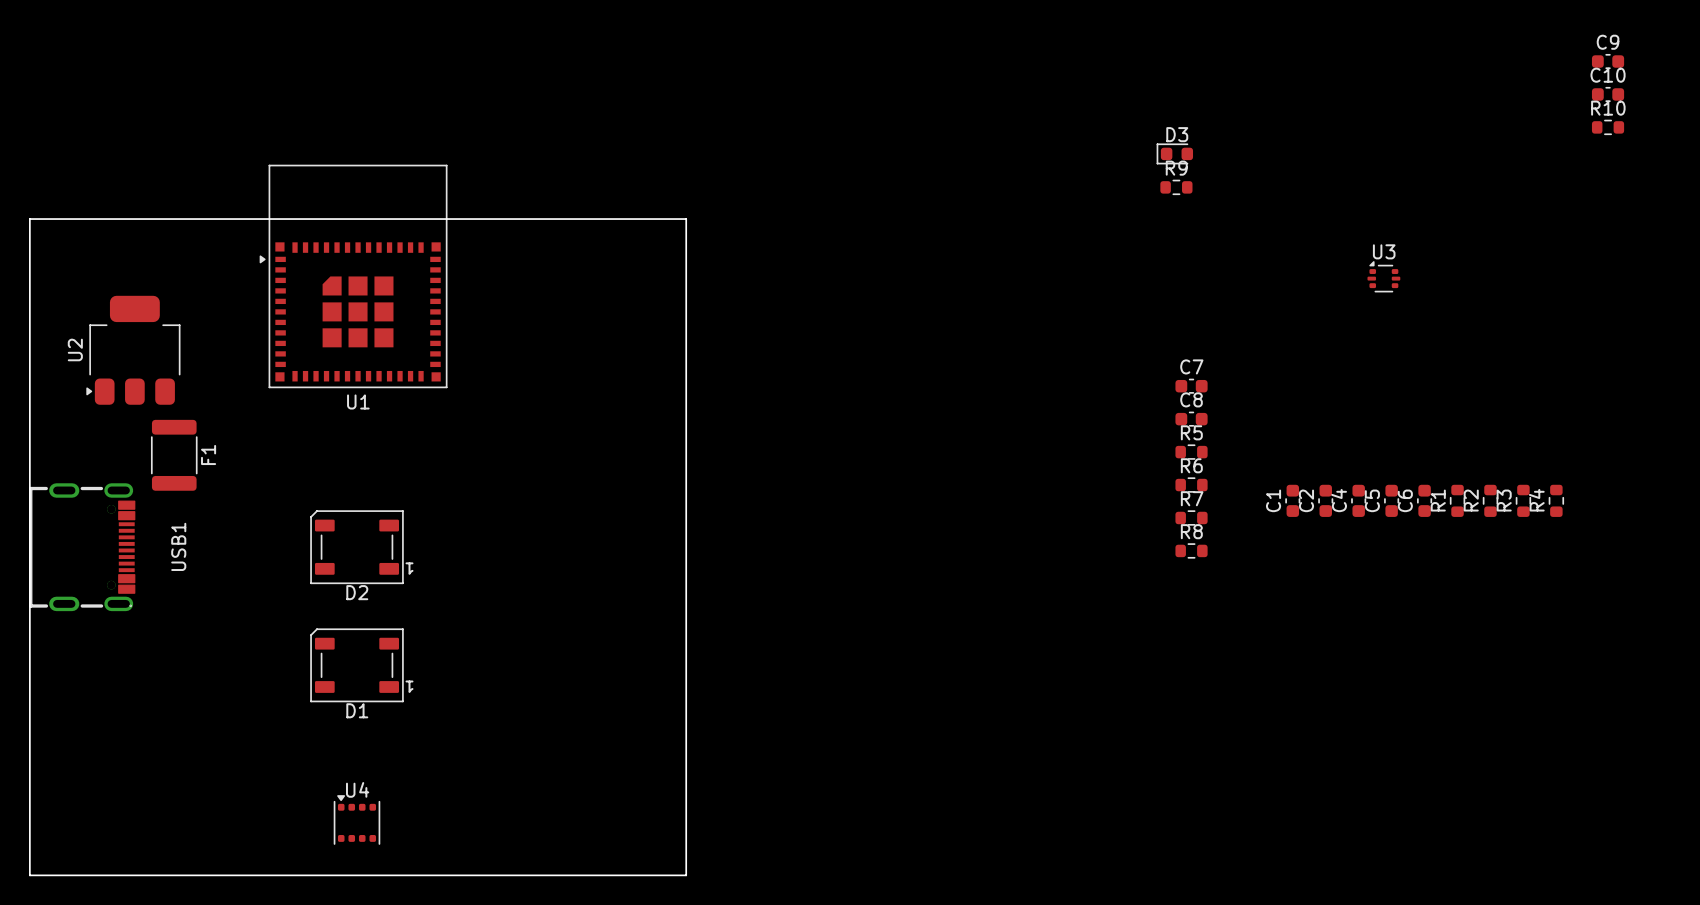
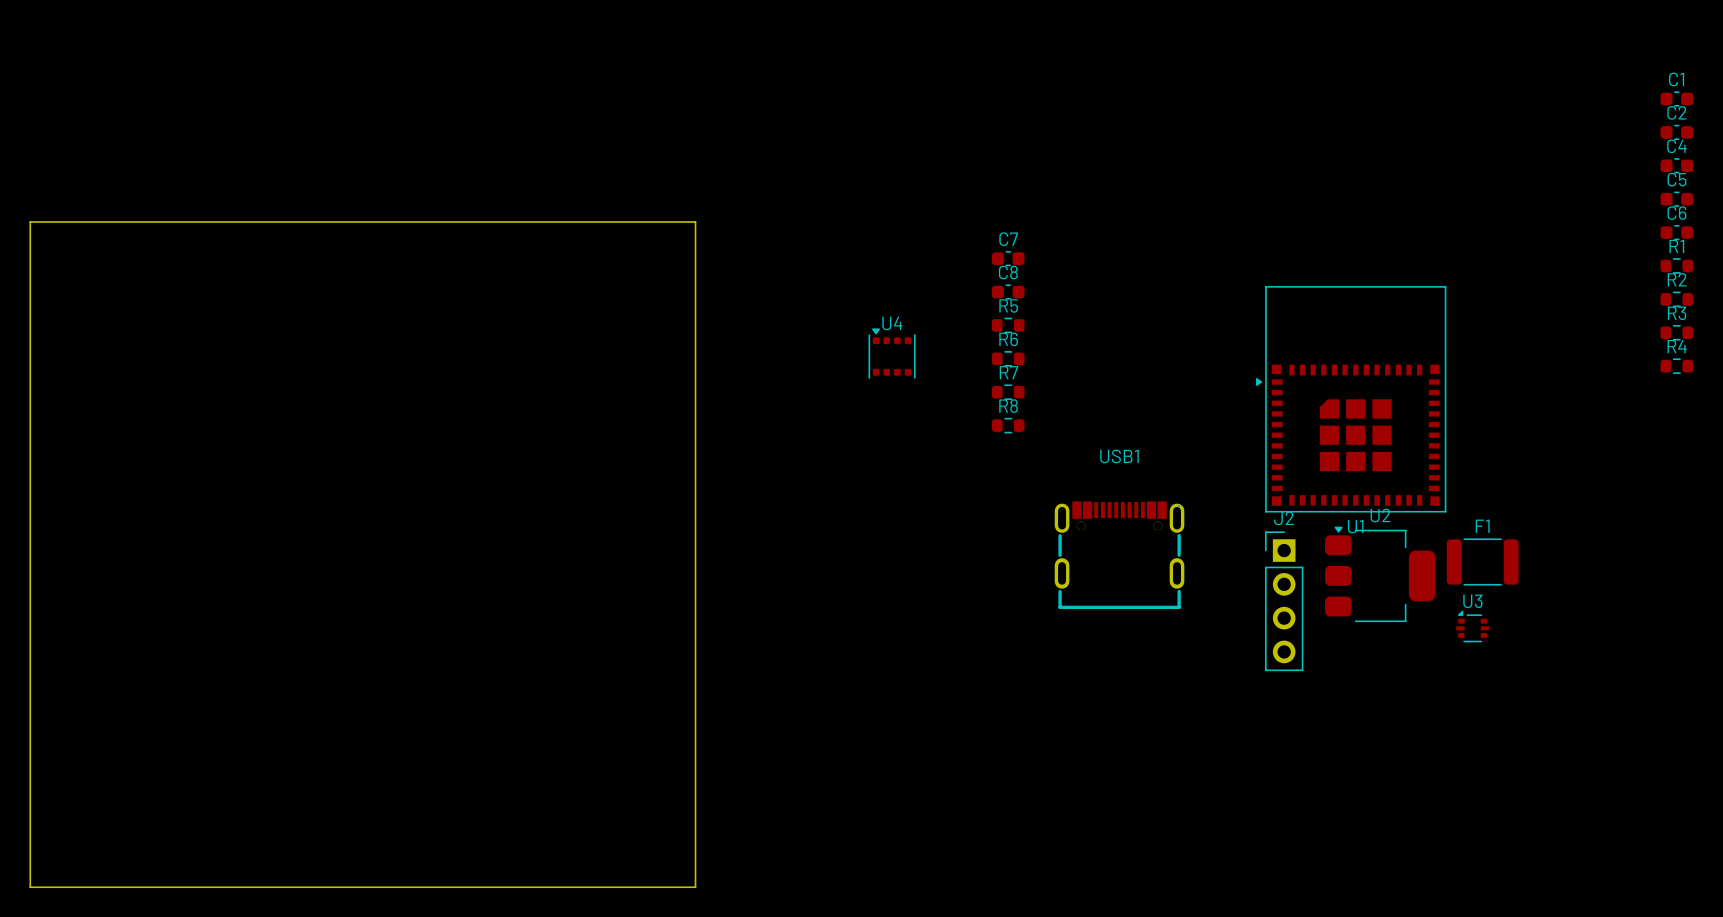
C9: (1608, 61) -> none
C10: (1608, 94) -> none
R10: (1608, 127) -> none
D3: (1174, 153) -> none
R9: (1176, 187) -> none
U1 position: (353, 276) -> (1351, 399)
U3 position: (1383, 276) -> (1472, 626)
U2 rotation: 0° (133, 350) -> 90° clockwise (1380, 574)
U2 position: (133, 350) -> (1380, 574)
C7 position: (1191, 386) -> (1008, 258)
C8 position: (1191, 419) -> (1008, 292)
R5 position: (1191, 452) -> (1008, 325)
F1 name position: F1 (208, 454) -> F1 (1482, 526)
F1 rotation: 0° (174, 455) -> 90° clockwise (1482, 562)
F1 position: (174, 455) -> (1482, 562)
R6 position: (1191, 485) -> (1008, 358)
C1 rotation: 0° (1292, 500) -> 90° clockwise (1676, 98)
C1 position: (1292, 500) -> (1676, 98)
C2 rotation: 0° (1325, 500) -> 90° clockwise (1676, 132)
C2 position: (1325, 500) -> (1676, 132)
C4 rotation: 0° (1358, 500) -> 90° clockwise (1676, 165)
C4 position: (1358, 500) -> (1676, 165)
C5 rotation: 0° (1391, 500) -> 90° clockwise (1676, 199)
C5 position: (1391, 500) -> (1676, 199)
C6 rotation: 0° (1424, 500) -> 90° clockwise (1676, 232)
C6 position: (1424, 500) -> (1676, 232)
R1 rotation: 0° (1457, 500) -> 90° clockwise (1676, 265)
R1 position: (1457, 500) -> (1676, 265)
R2 rotation: 0° (1490, 500) -> 90° clockwise (1676, 299)
R2 position: (1490, 500) -> (1676, 299)
R3 rotation: 0° (1523, 500) -> 90° clockwise (1676, 332)
R3 position: (1523, 500) -> (1676, 332)
R4 rotation: 0° (1556, 500) -> 90° clockwise (1676, 366)
R4 position: (1556, 500) -> (1676, 366)
R7 position: (1191, 517) -> (1008, 392)
USB1 rotation: 0° (82, 547) -> 90° counterclockwise (1119, 555)
USB1 position: (82, 547) -> (1119, 555)
D2: (356, 547) -> none
R8 position: (1191, 550) -> (1008, 425)
J2: none -> (1284, 601)
D1: (356, 665) -> none
U4 position: (356, 819) -> (892, 353)

